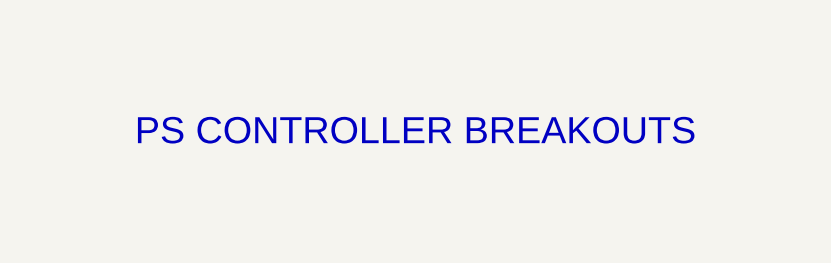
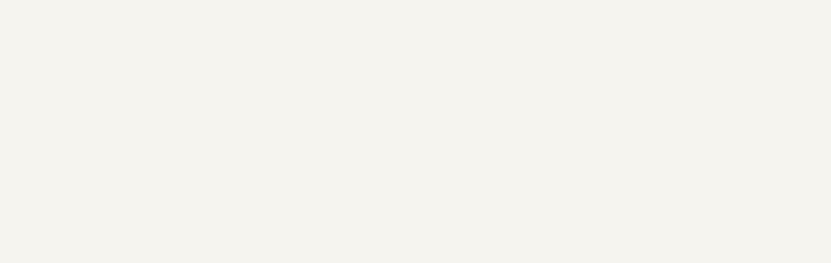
text: PS CONTROLLER BREAKOUTS (416, 130) -> none

